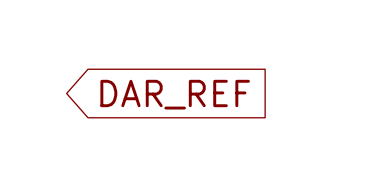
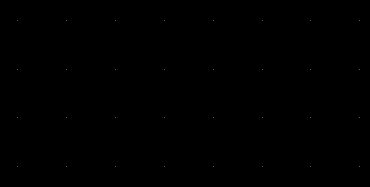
global label: DAR_REF (175, 94) -> none

